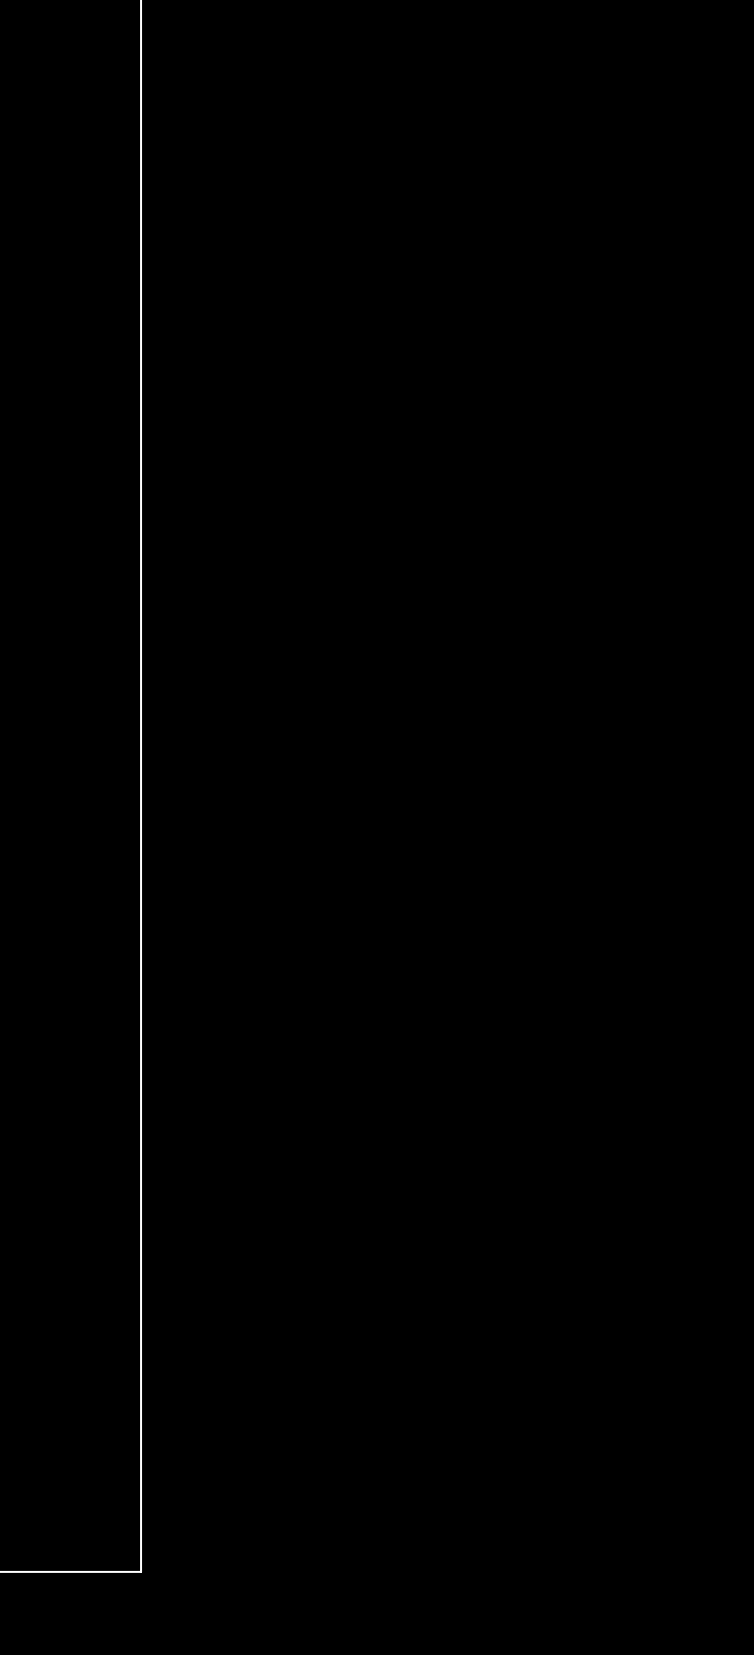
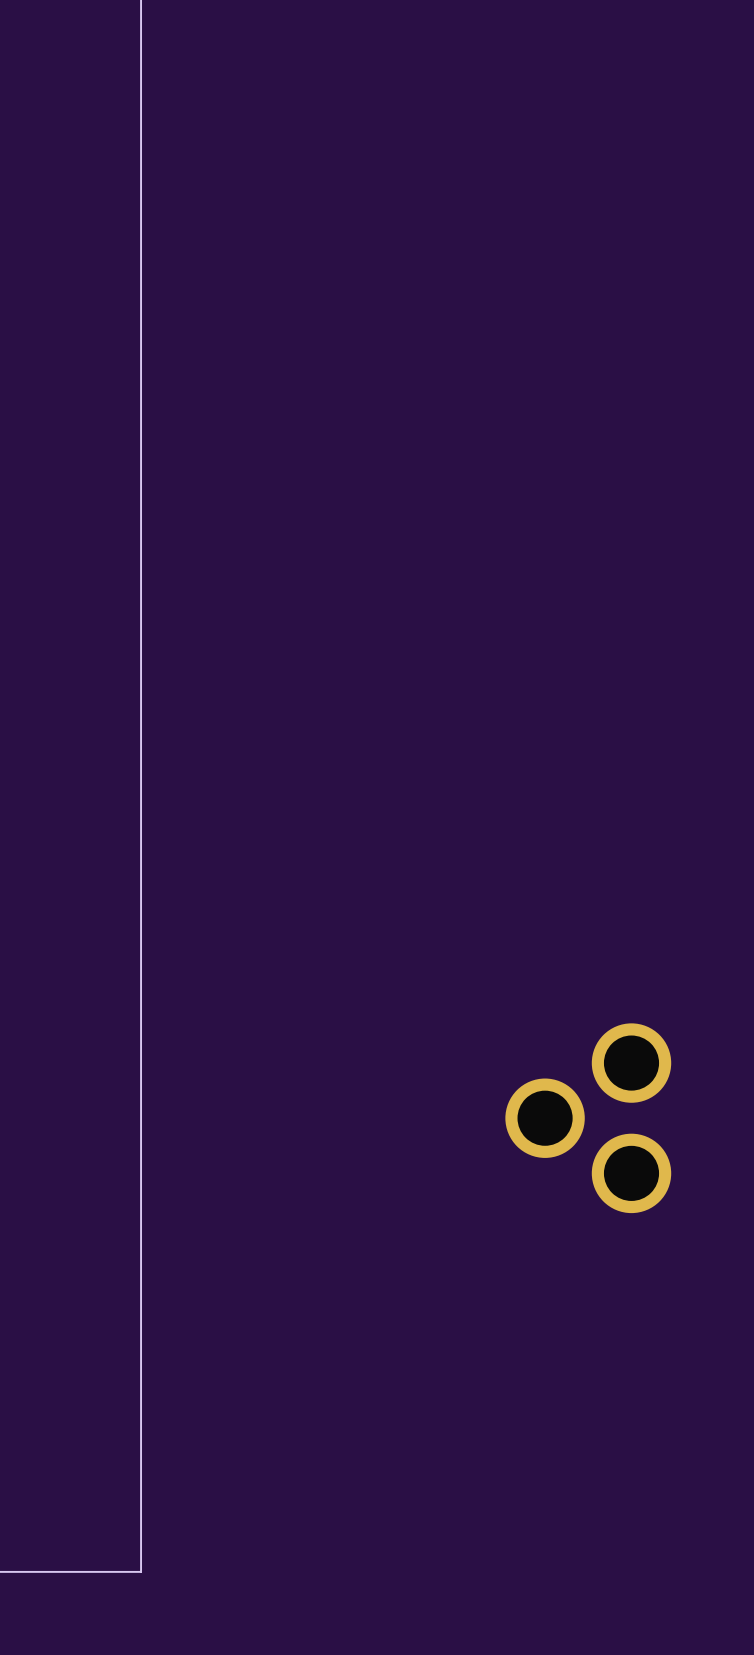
part: none -> (588, 1118)

